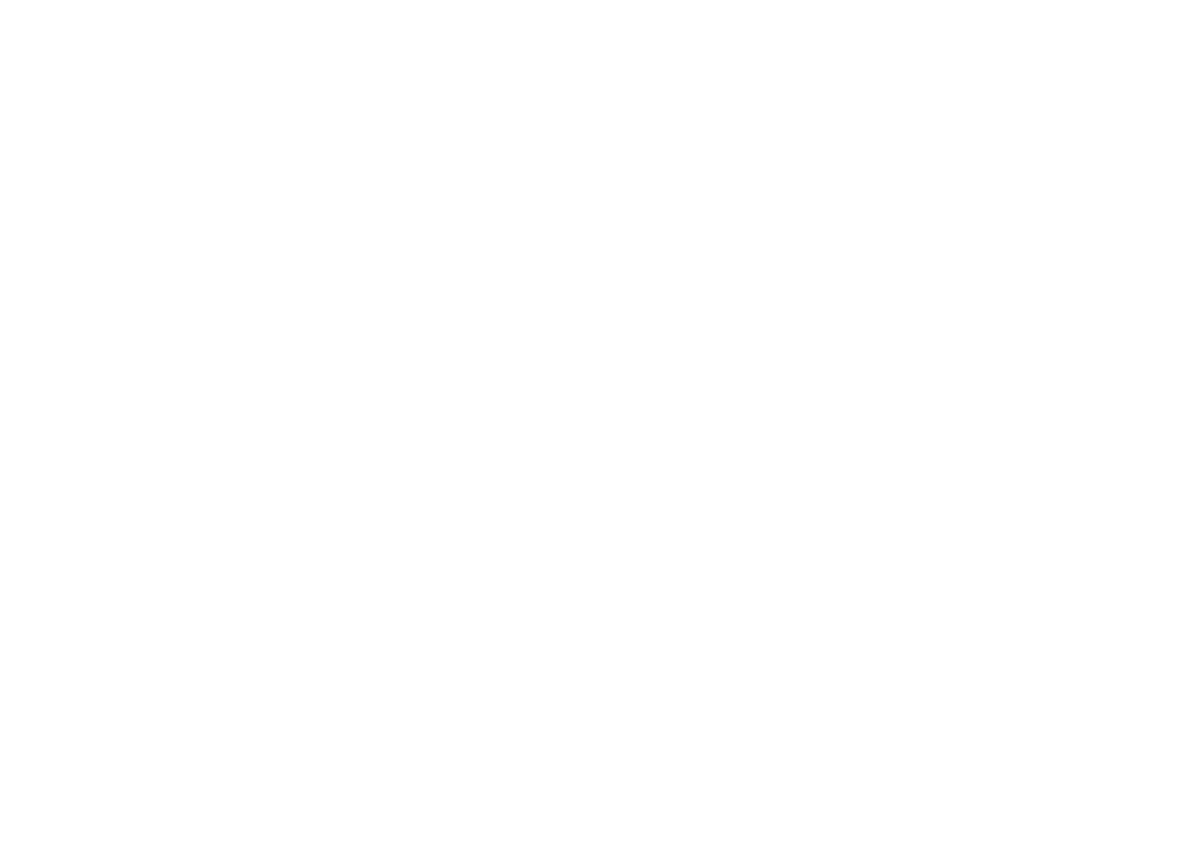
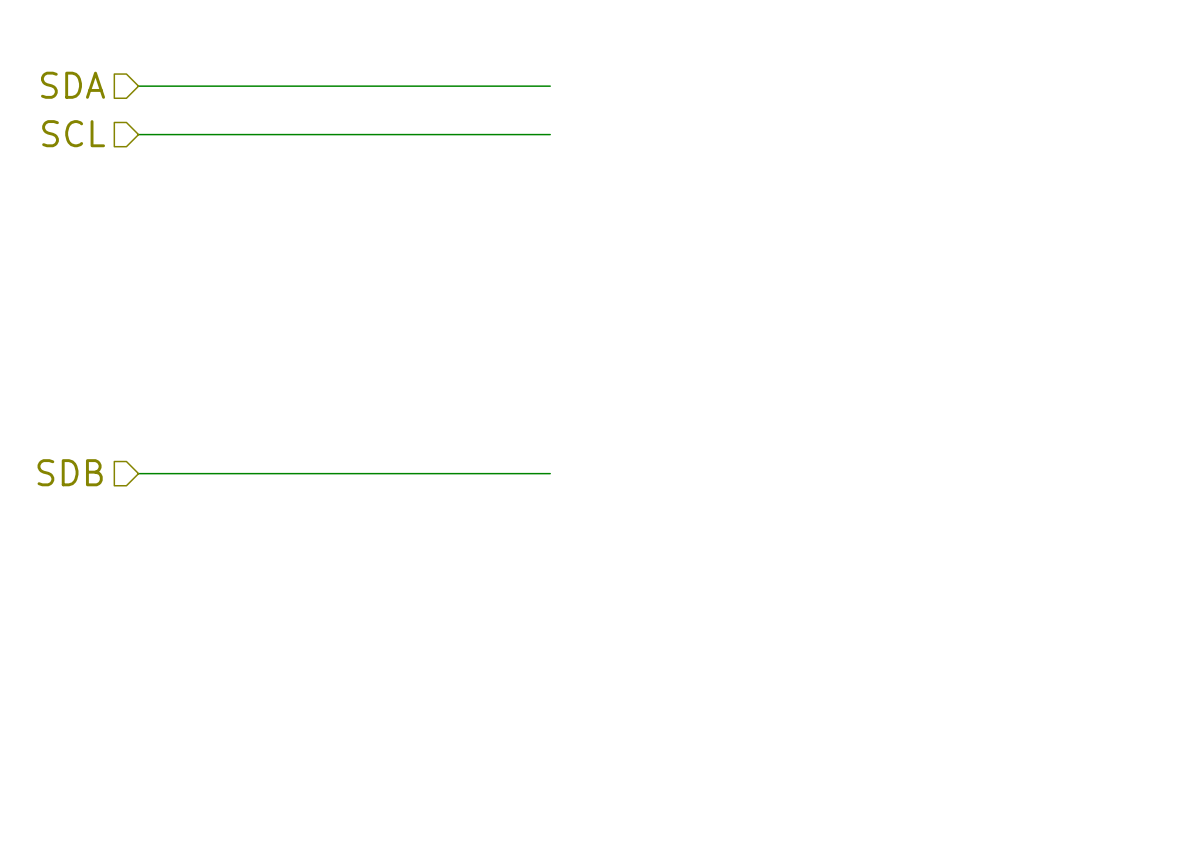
hierarchical label: none -> SDA (73, 85)
wire: none -> (138, 86) (550, 86)
hierarchical label: none -> SCL (73, 133)
wire: none -> (138, 134) (550, 134)
hierarchical label: none -> SDB (70, 472)
wire: none -> (138, 473) (550, 473)

